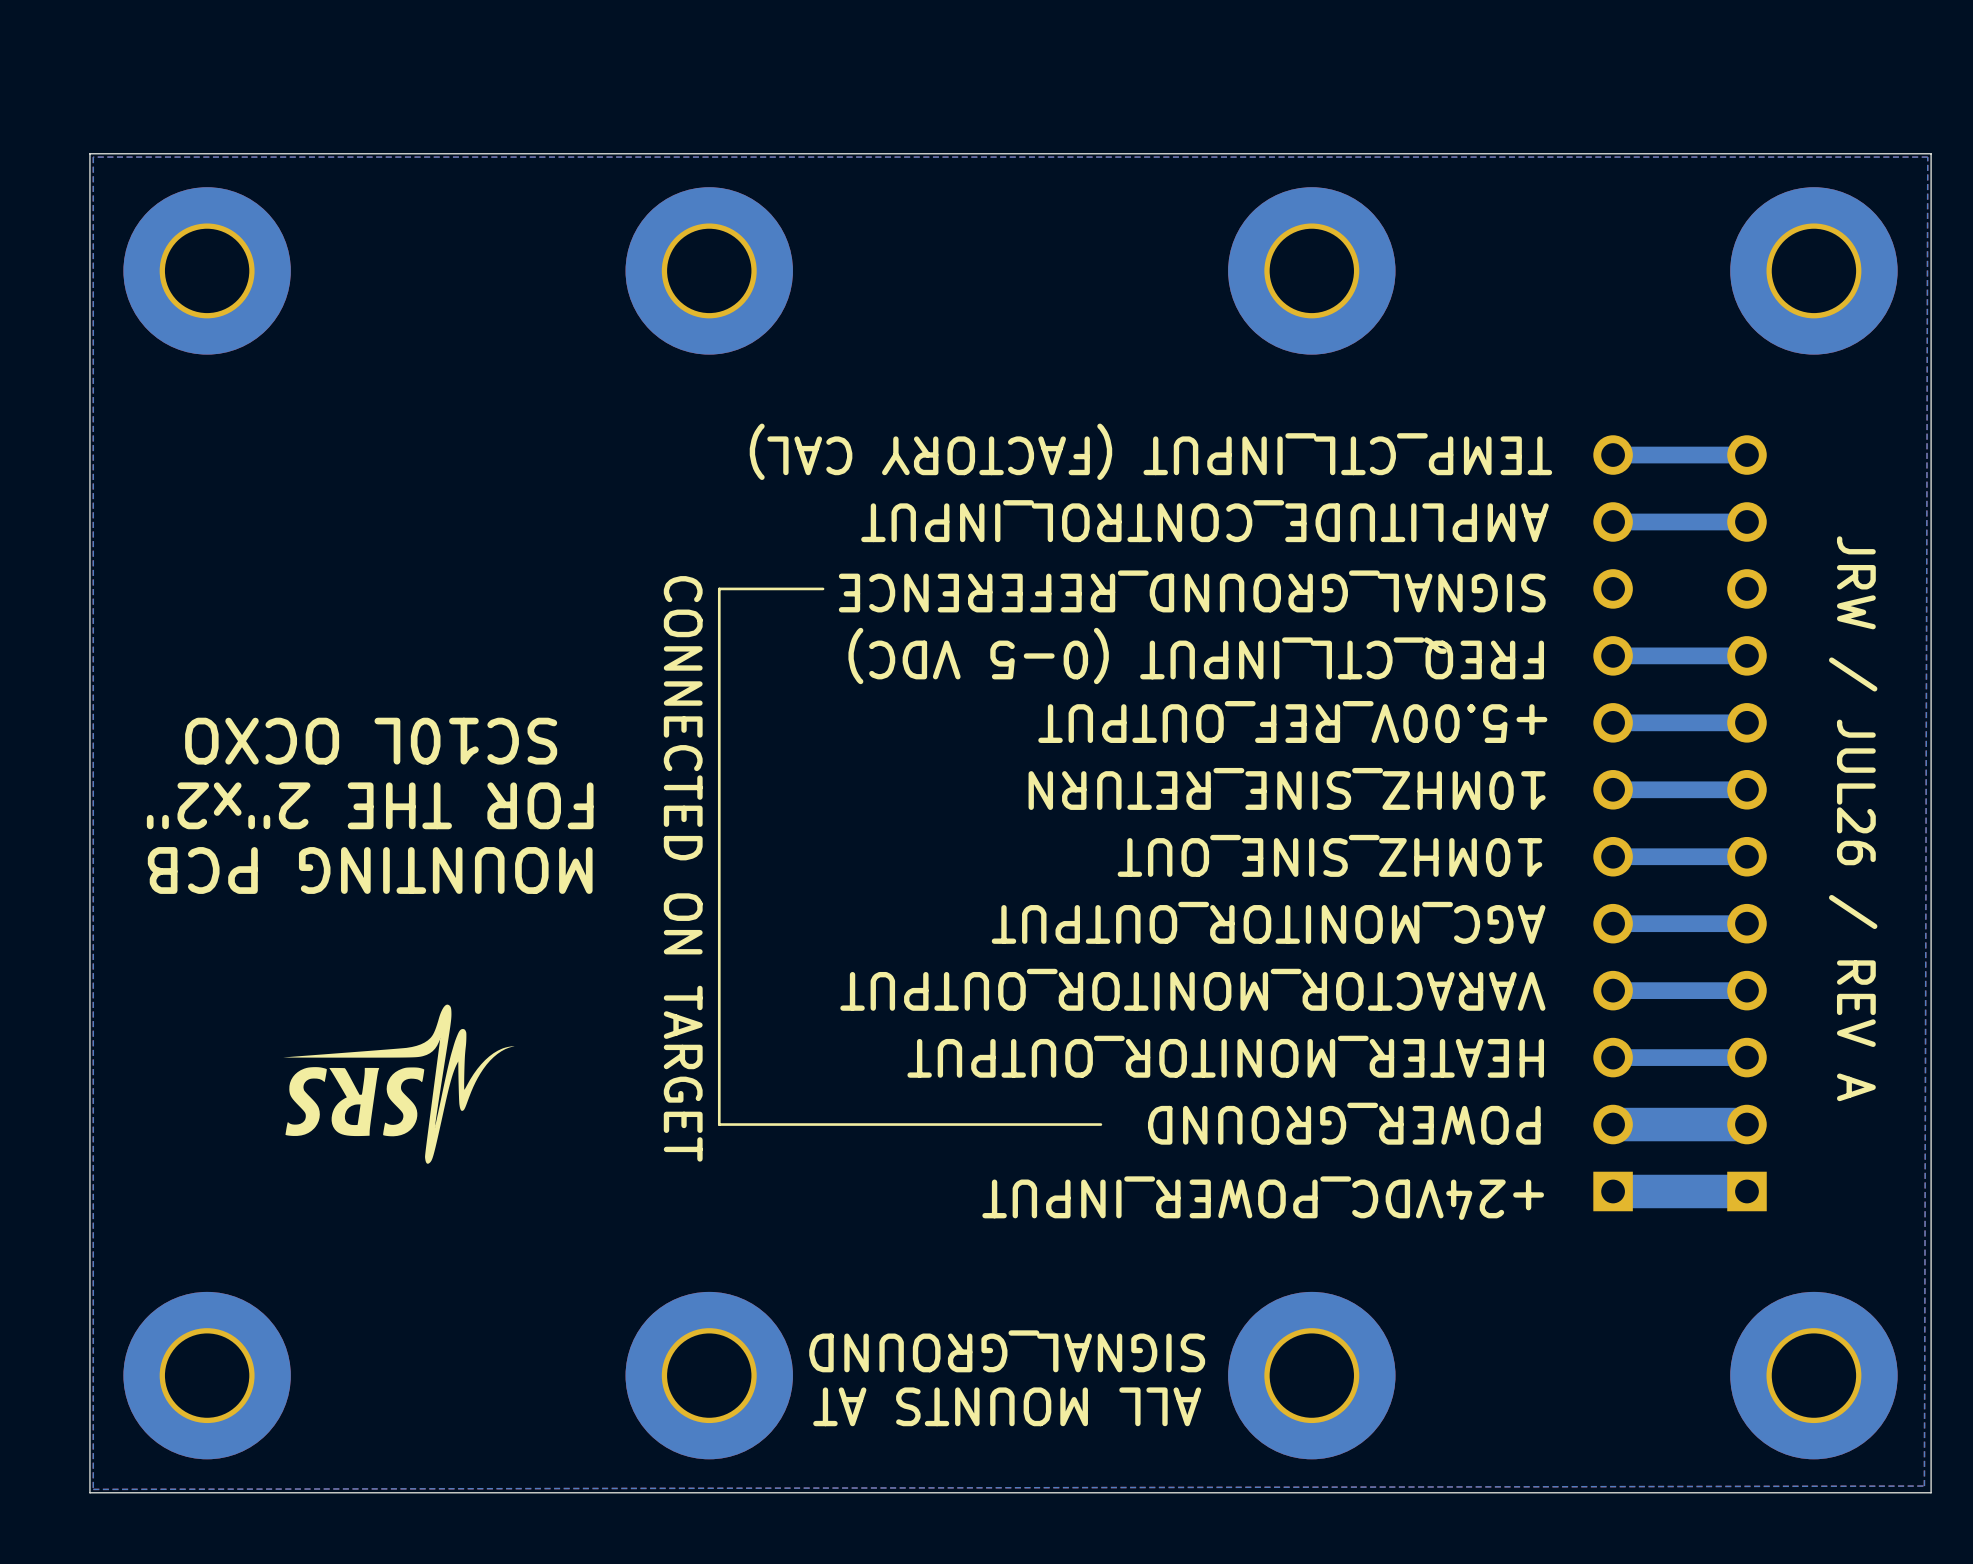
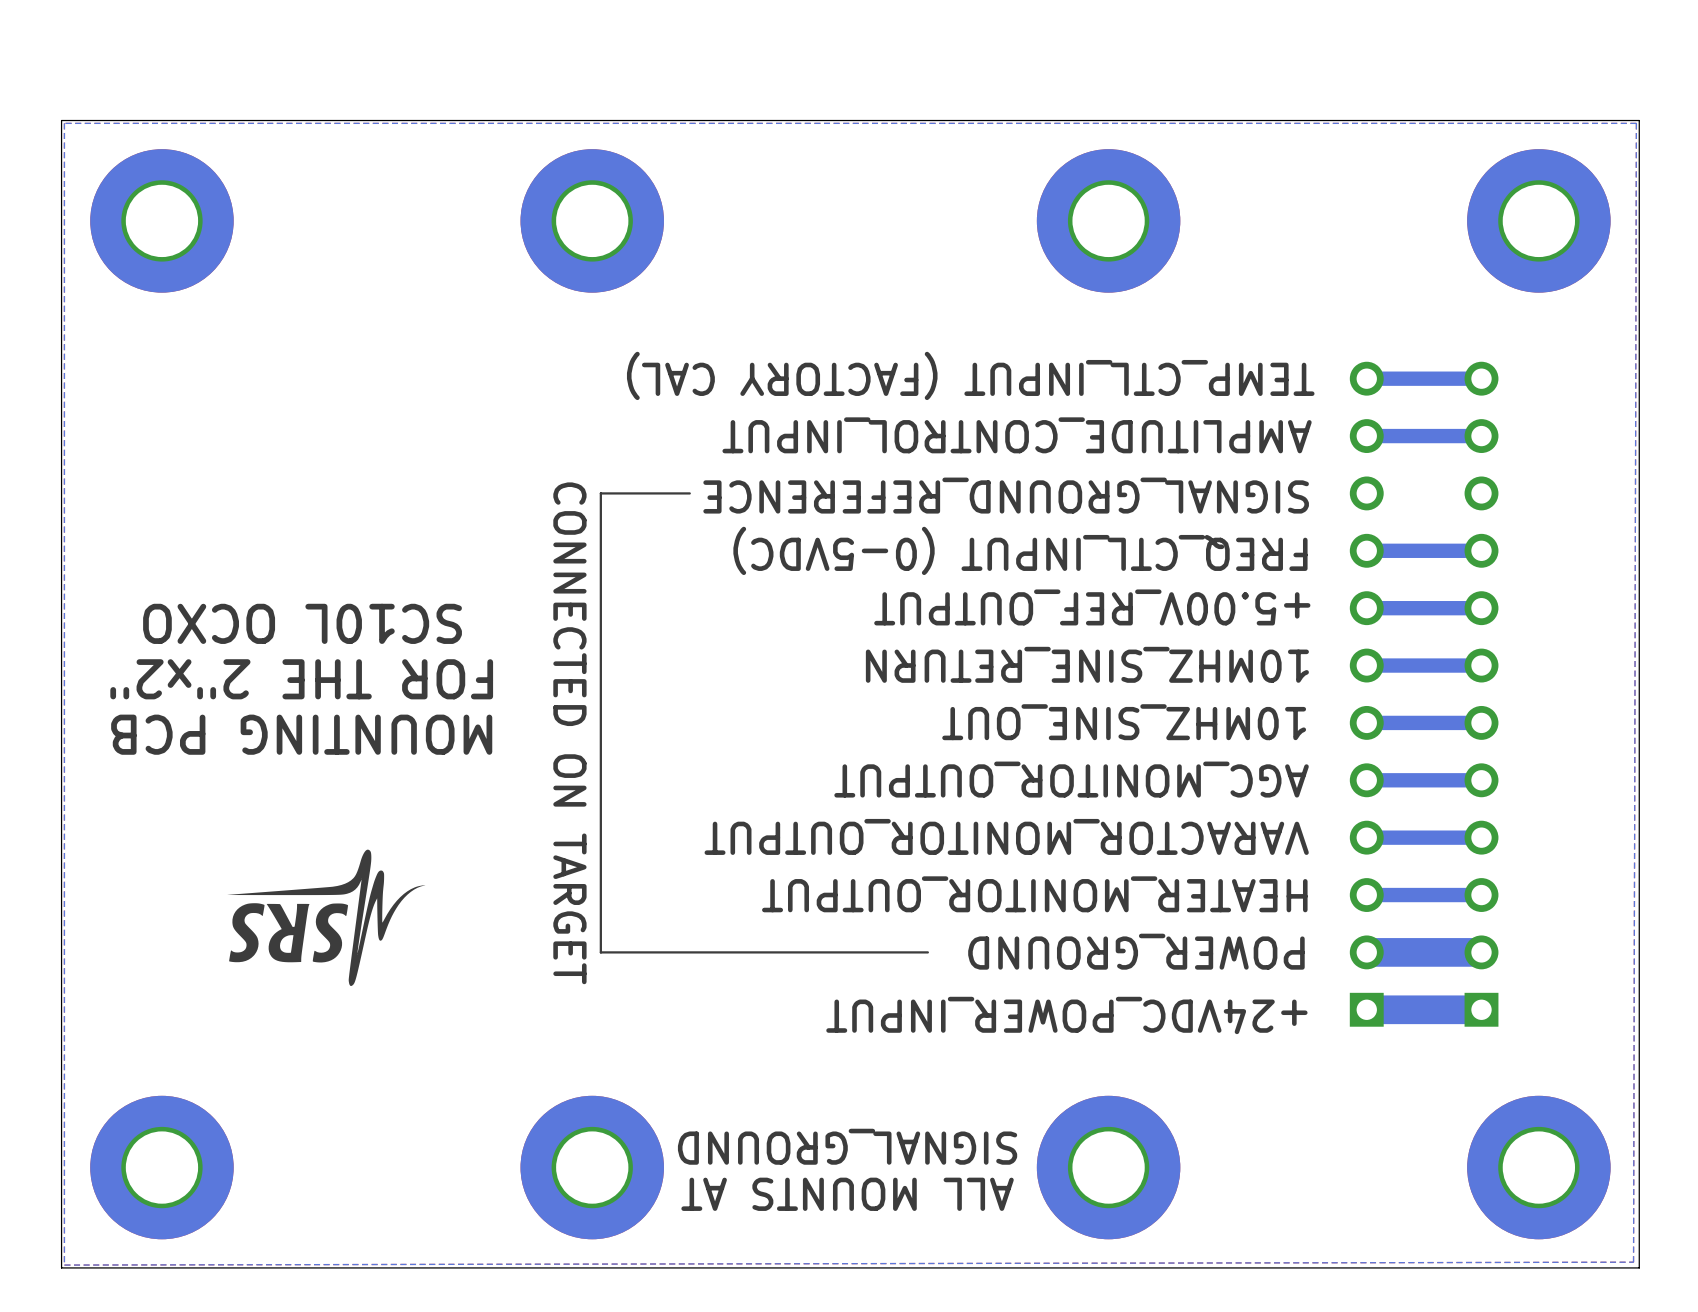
text: FREQ_CTL_INPUT (0-5 VDC) (1196, 655) -> FREQ_CTL_INPUT (0-5VDC) (1020, 550)
text: JRW / JUL26 / REV A (1853, 818) -> none

